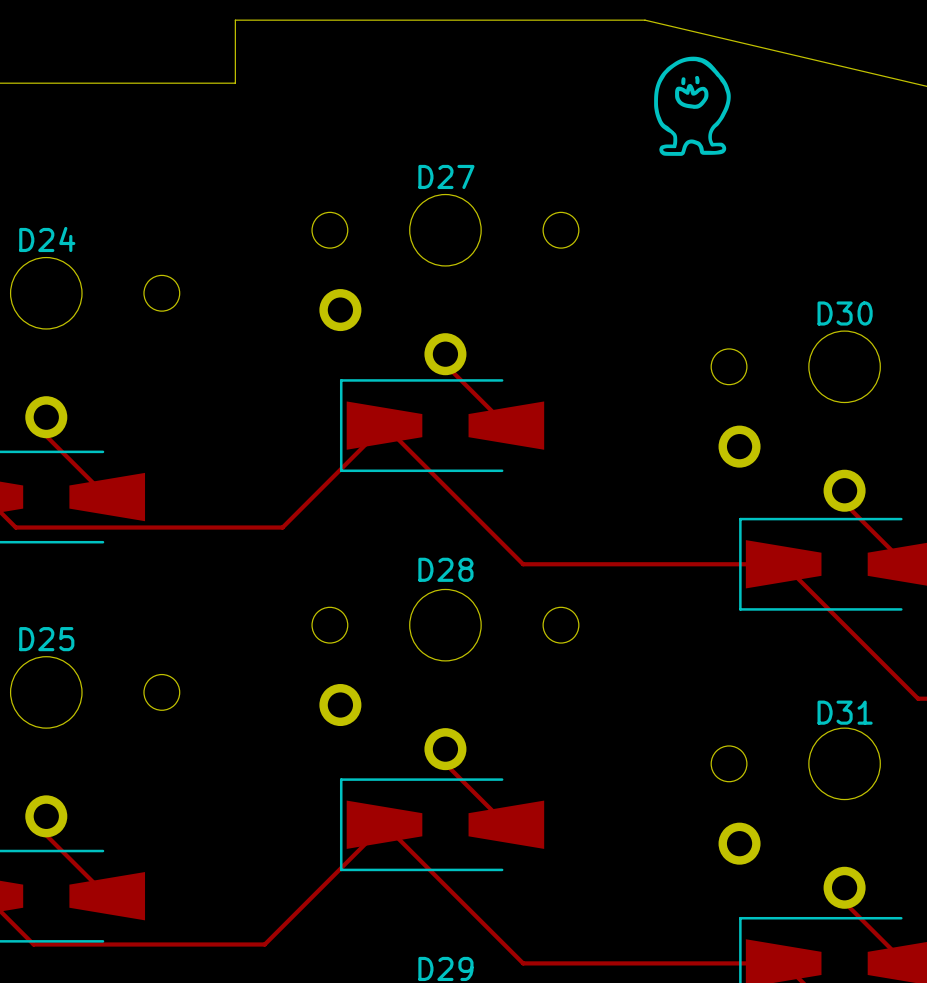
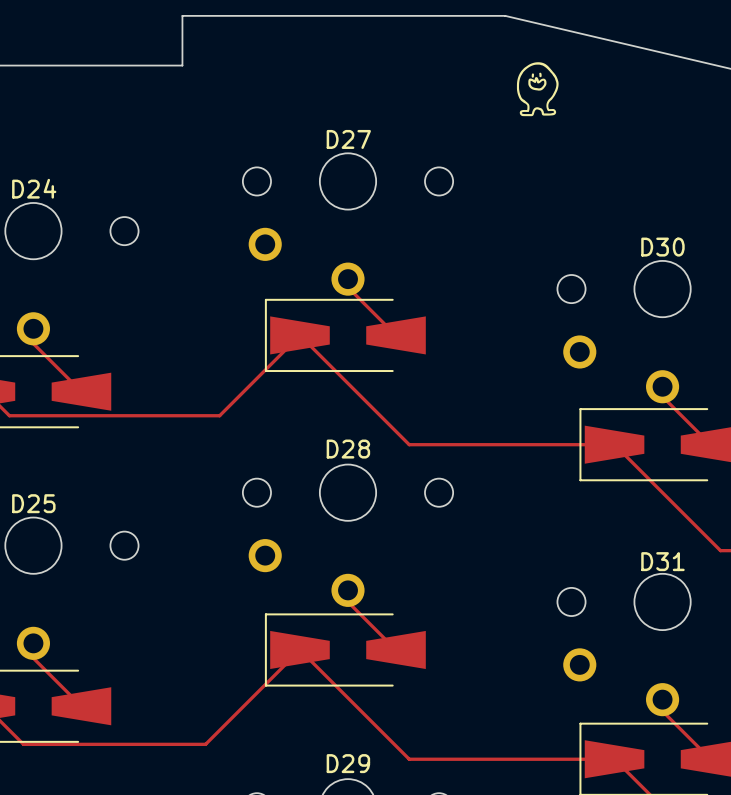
drawing: [654, 56, 731, 156] -> none
drawing: none -> [516, 62, 559, 117]
drawing shape: [675, 83, 709, 109] -> [539, 72, 542, 78]

